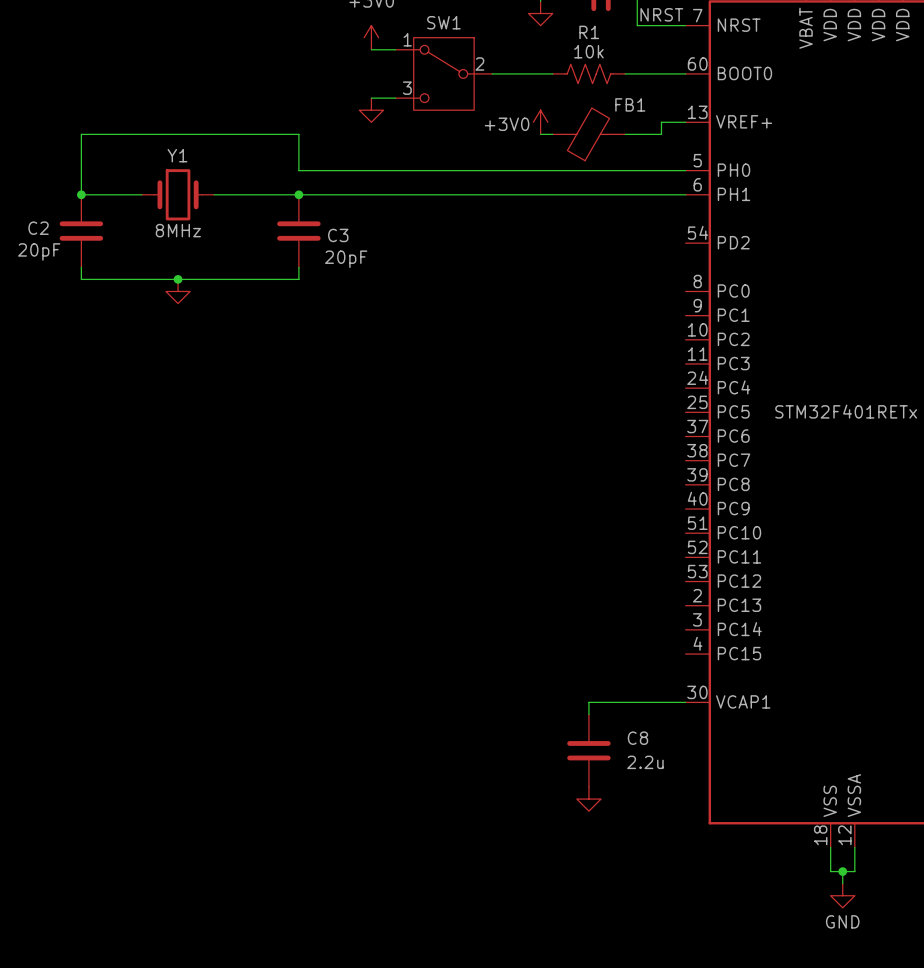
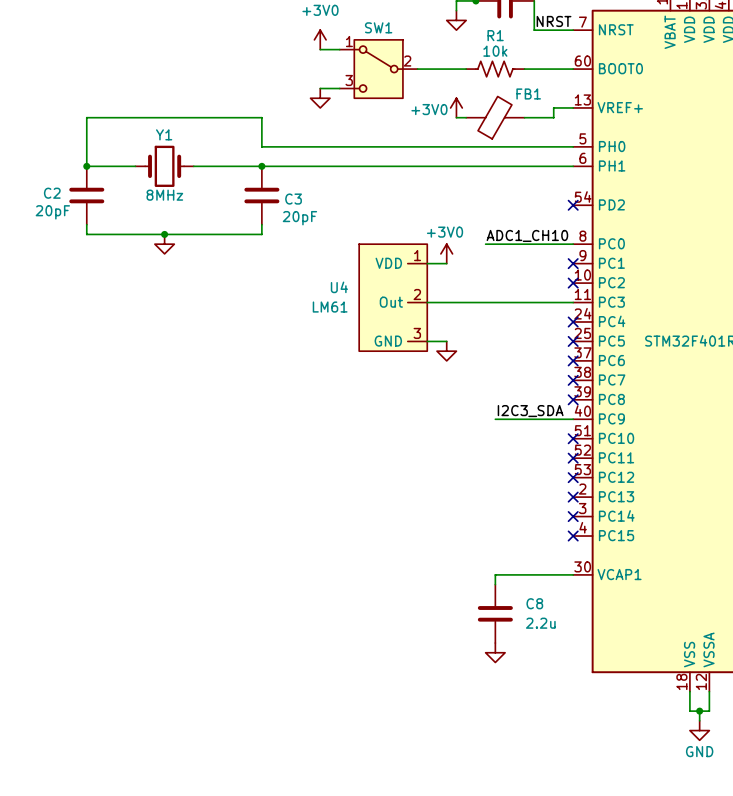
no-connect mark: none -> (573, 205)
label: none -> ADC1_CH10 (527, 235)
wire: none -> (485, 244) (573, 244)
power symbol: none -> +3V0 (446, 253)
wire: none -> (427, 263) (446, 263)
no-connect mark: none -> (573, 263)
no-connect mark: none -> (573, 283)
U4: none -> LM61 (393, 297)
wire: none -> (427, 302) (573, 302)
no-connect mark: none -> (573, 321)
wire: none -> (427, 341) (446, 341)
no-connect mark: none -> (573, 341)
power symbol: none -> (446, 351)
no-connect mark: none -> (573, 360)
no-connect mark: none -> (573, 380)
no-connect mark: none -> (573, 399)
label: none -> I2C3_SDA (530, 411)
wire: none -> (495, 419) (573, 419)
no-connect mark: none -> (573, 438)
no-connect mark: none -> (573, 458)
no-connect mark: none -> (573, 477)
no-connect mark: none -> (573, 497)
no-connect mark: none -> (573, 516)
no-connect mark: none -> (573, 536)

